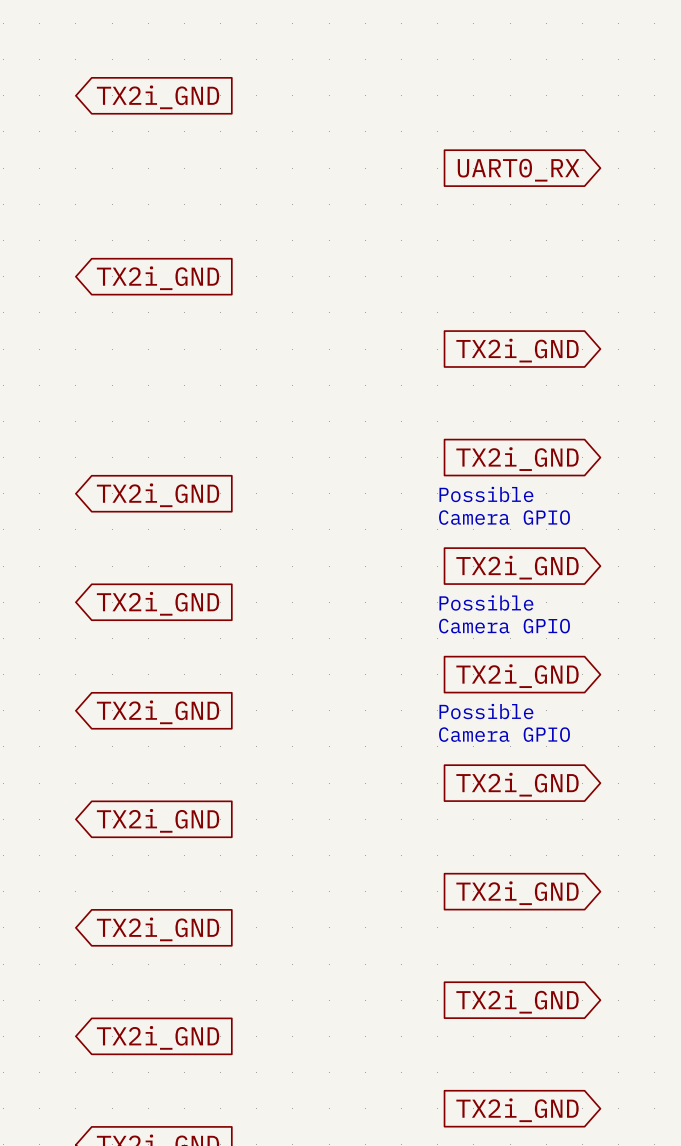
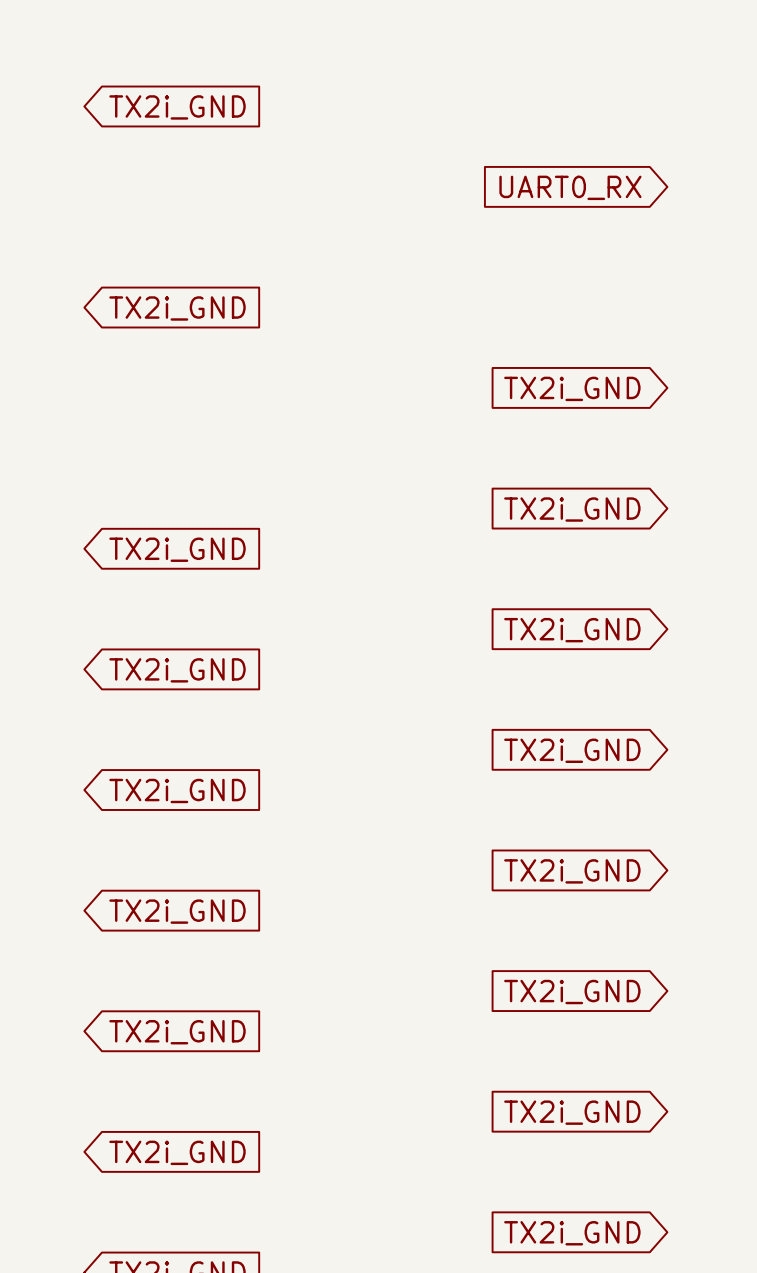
text: Possible (486, 494) -> none
text: Camera GPIO (504, 517) -> none
text: Possible (486, 602) -> none
text: Camera GPIO (504, 626) -> none
text: Possible (486, 711) -> none
text: Camera GPIO (504, 734) -> none

